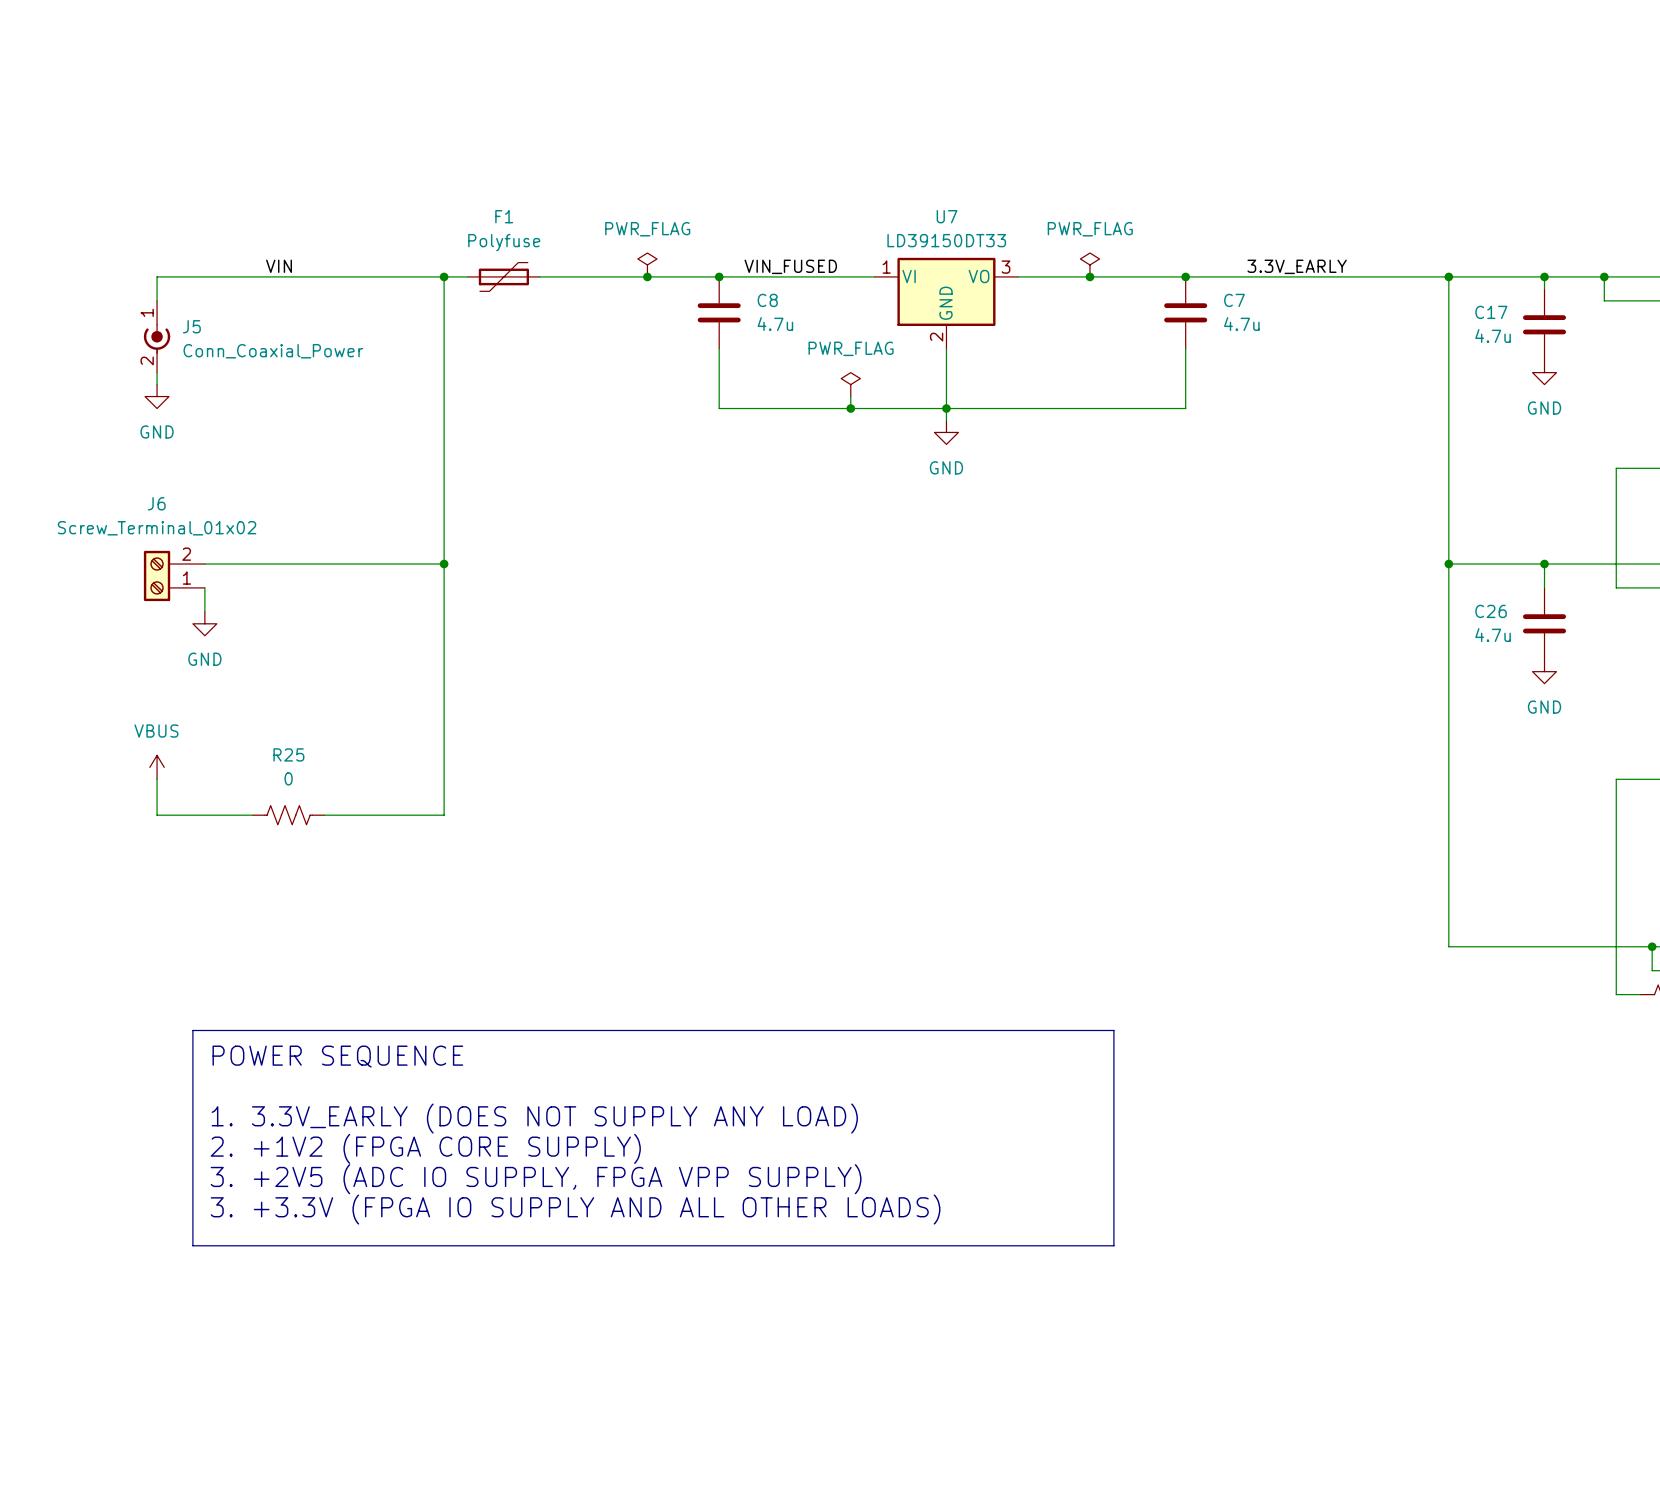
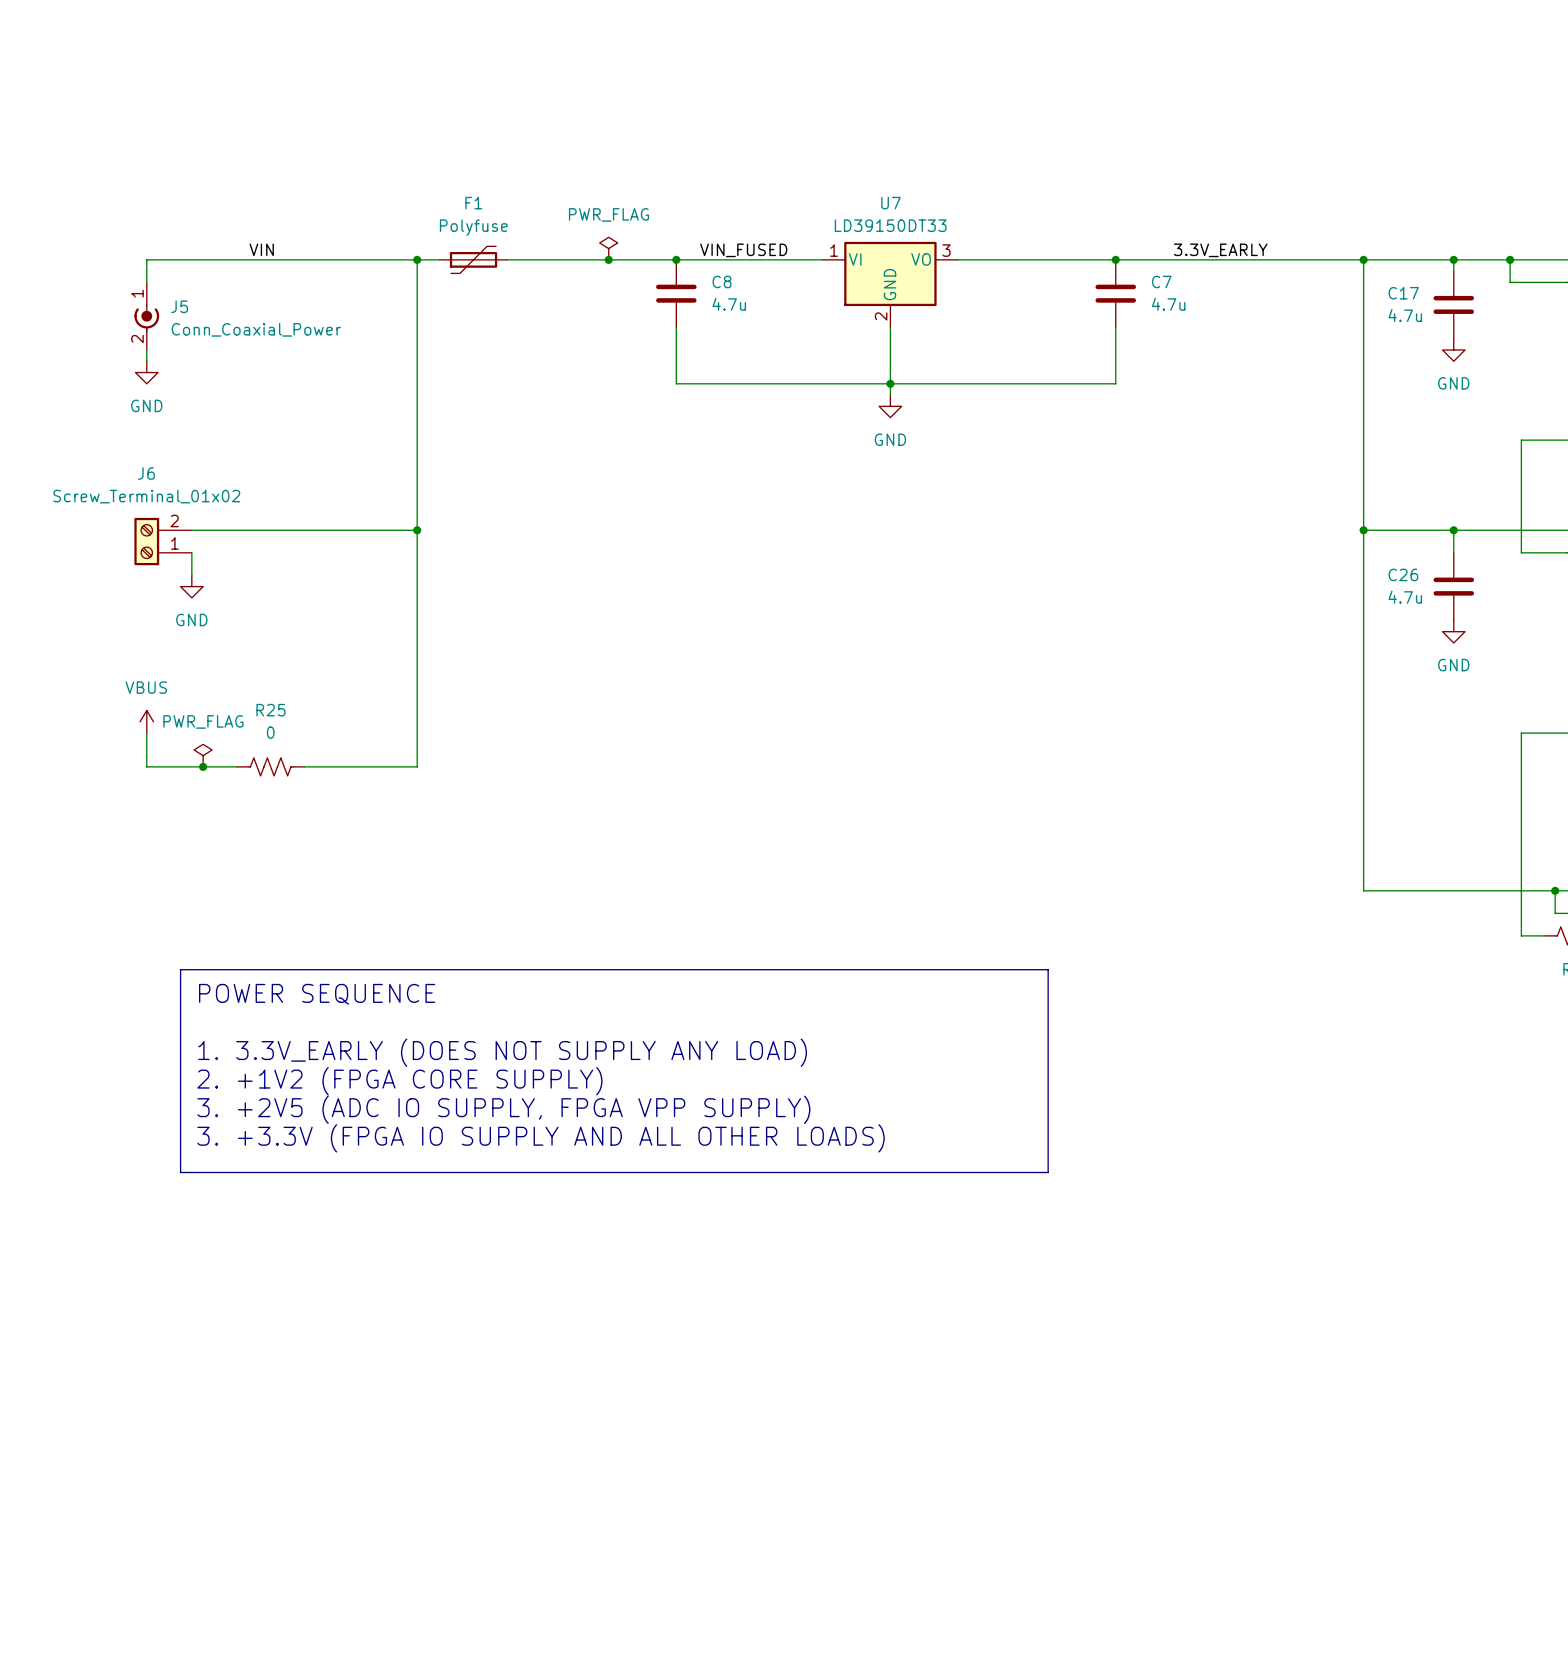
power symbol: PWR_FLAG (1089, 264) -> none
junction: (1089, 276) -> none
power symbol: PWR_FLAG (850, 384) -> none
wire: (850, 396) (850, 408) -> none
junction: (850, 408) -> none
power symbol: none -> PWR_FLAG (203, 755)
junction: none -> (203, 766)

